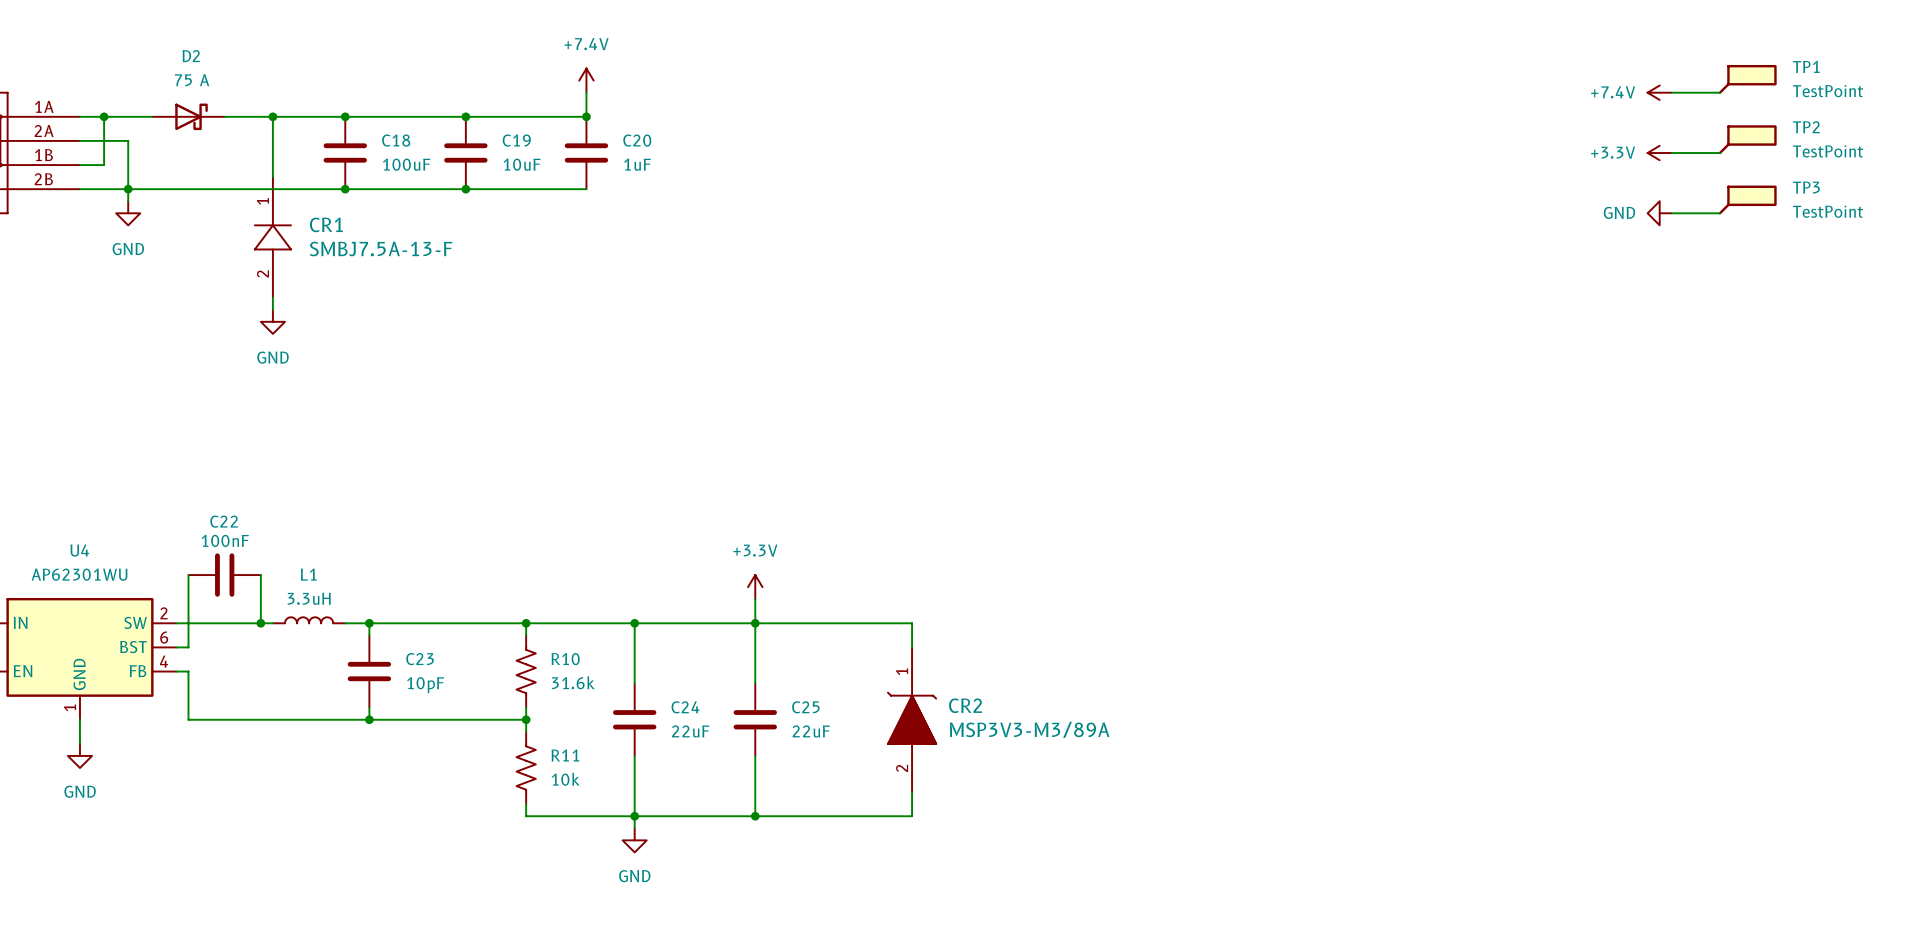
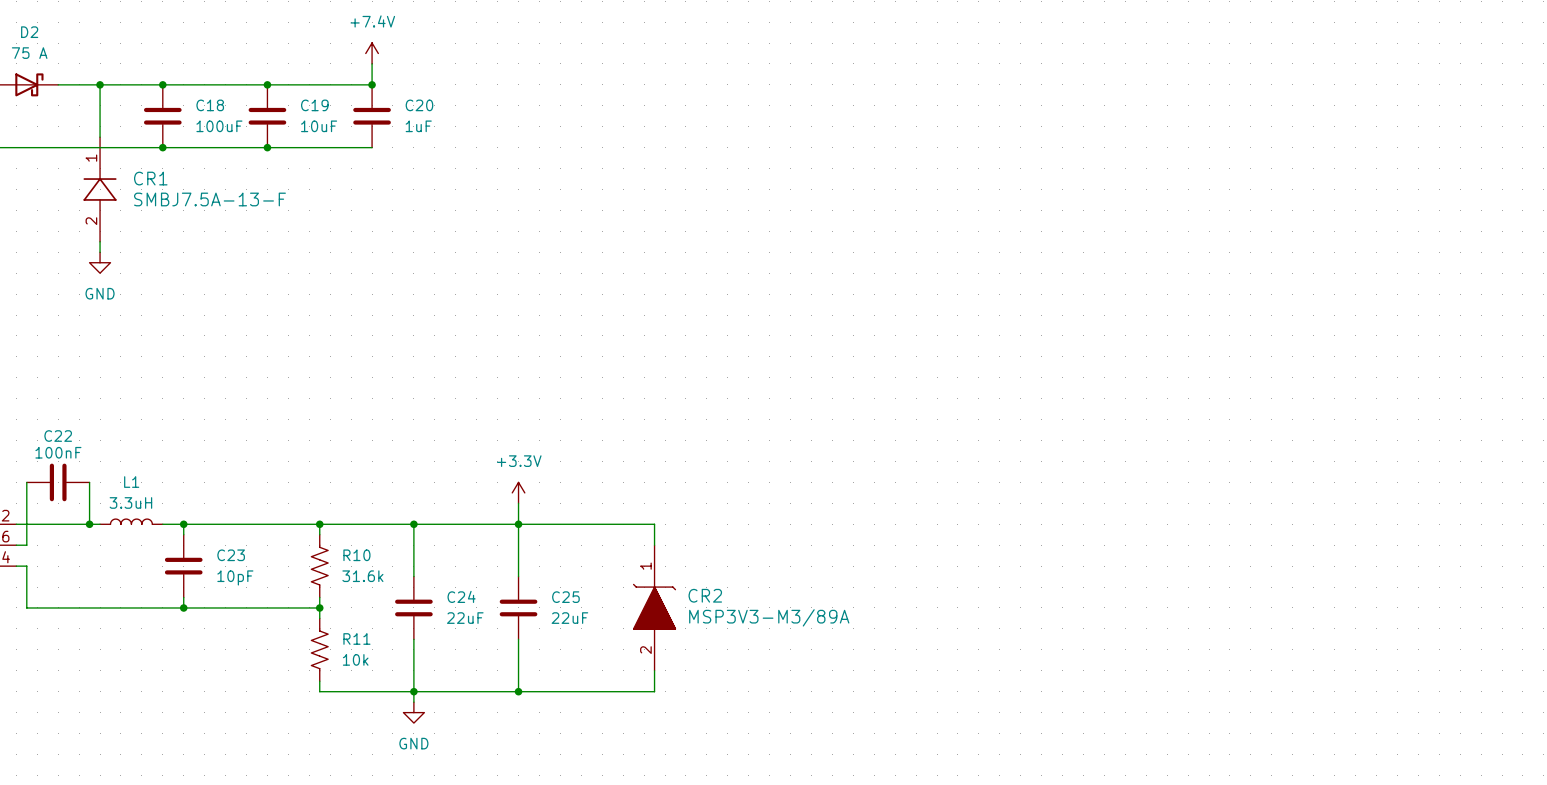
TP1: TestPoint (1747, 79) -> none
power symbol: +7.4V (1659, 92) -> none
wire: (1671, 92) (1719, 92) -> none
TP2: TestPoint (1747, 139) -> none
power symbol: +3.3V (1659, 153) -> none
wire: (1671, 153) (1719, 153) -> none
TP3: TestPoint (1747, 200) -> none
power symbol: GND (1659, 213) -> none
wire: (1671, 213) (1719, 213) -> none

